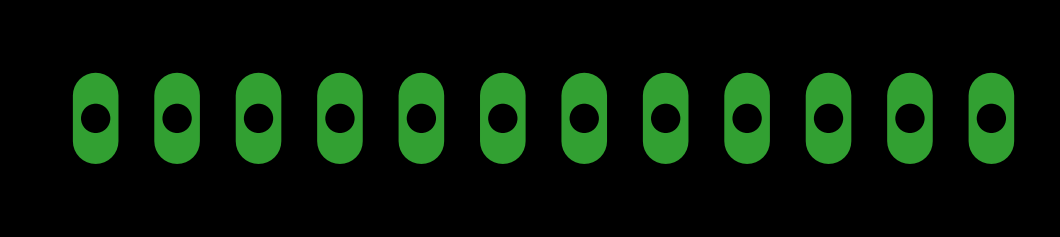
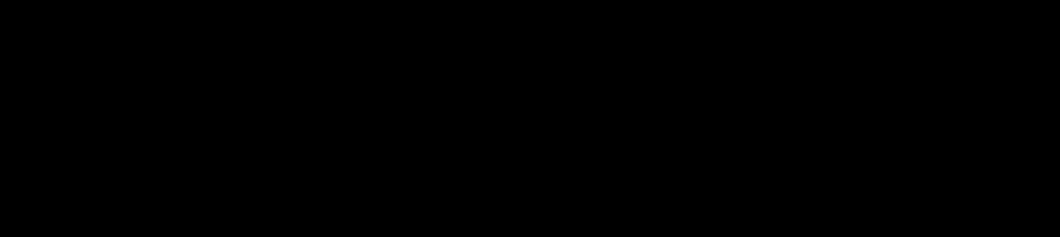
part: (177, 118) -> none
part: (421, 118) -> none
part: (665, 118) -> none
part: (909, 118) -> none

